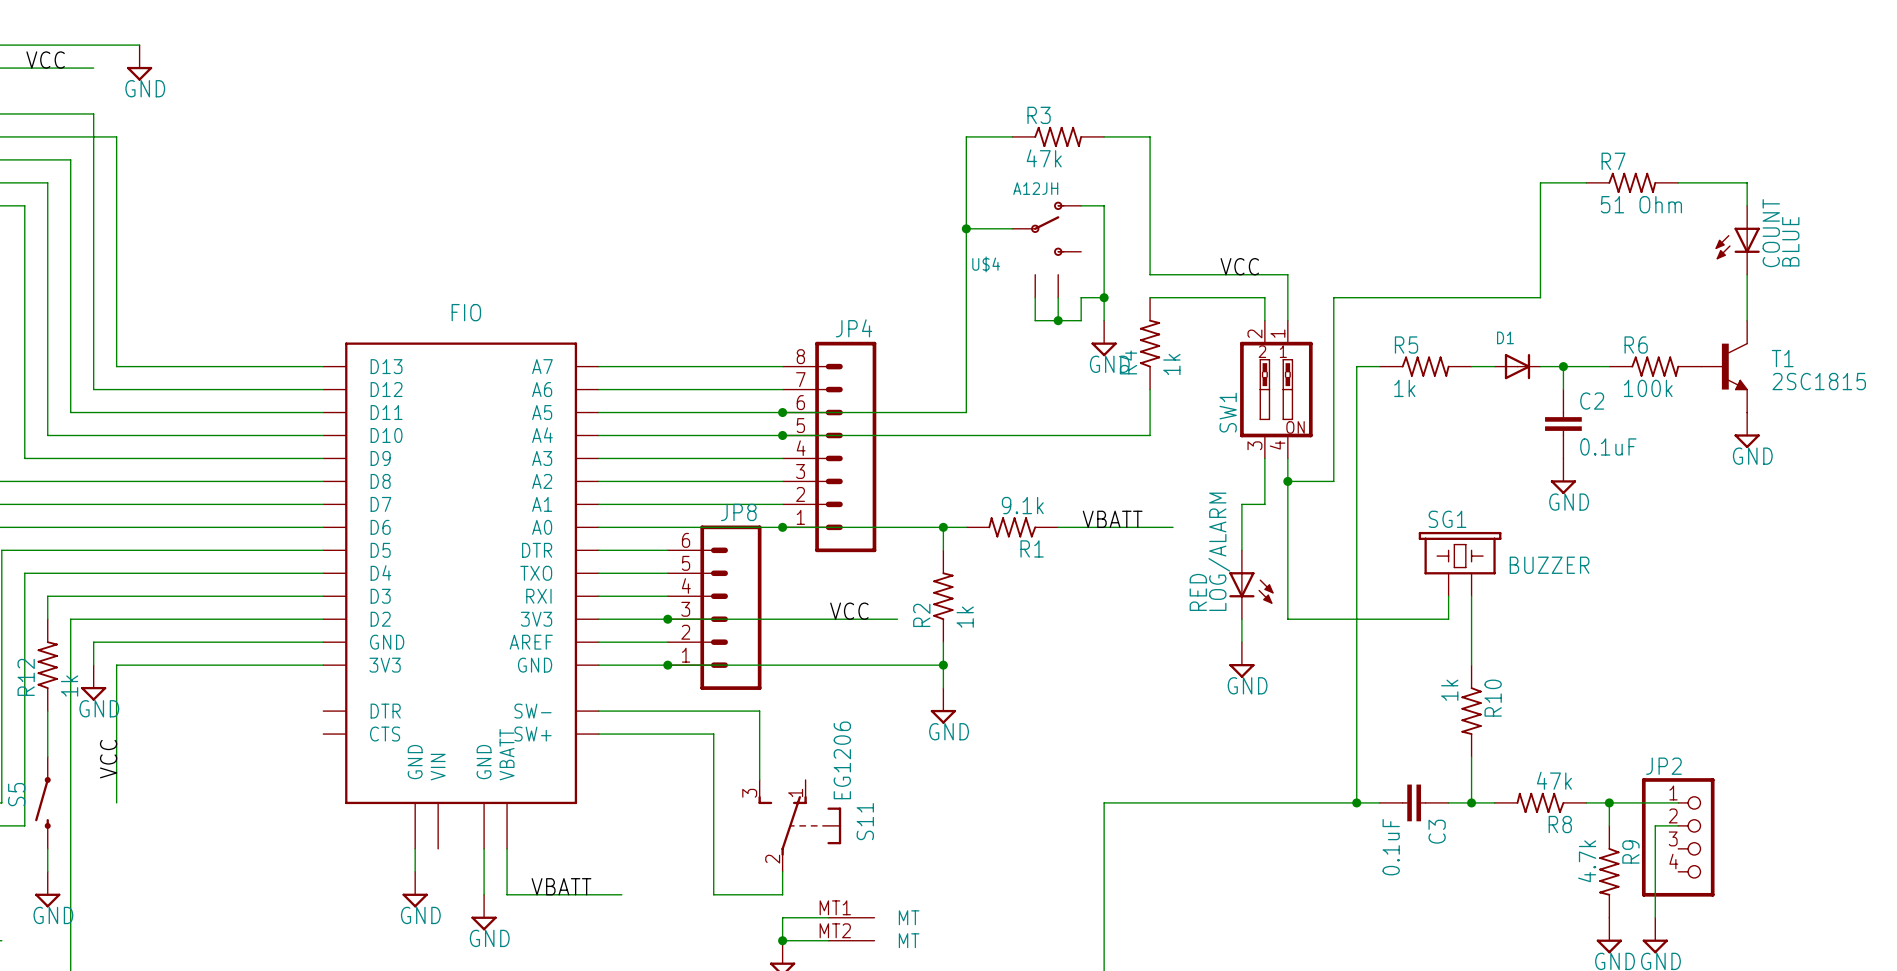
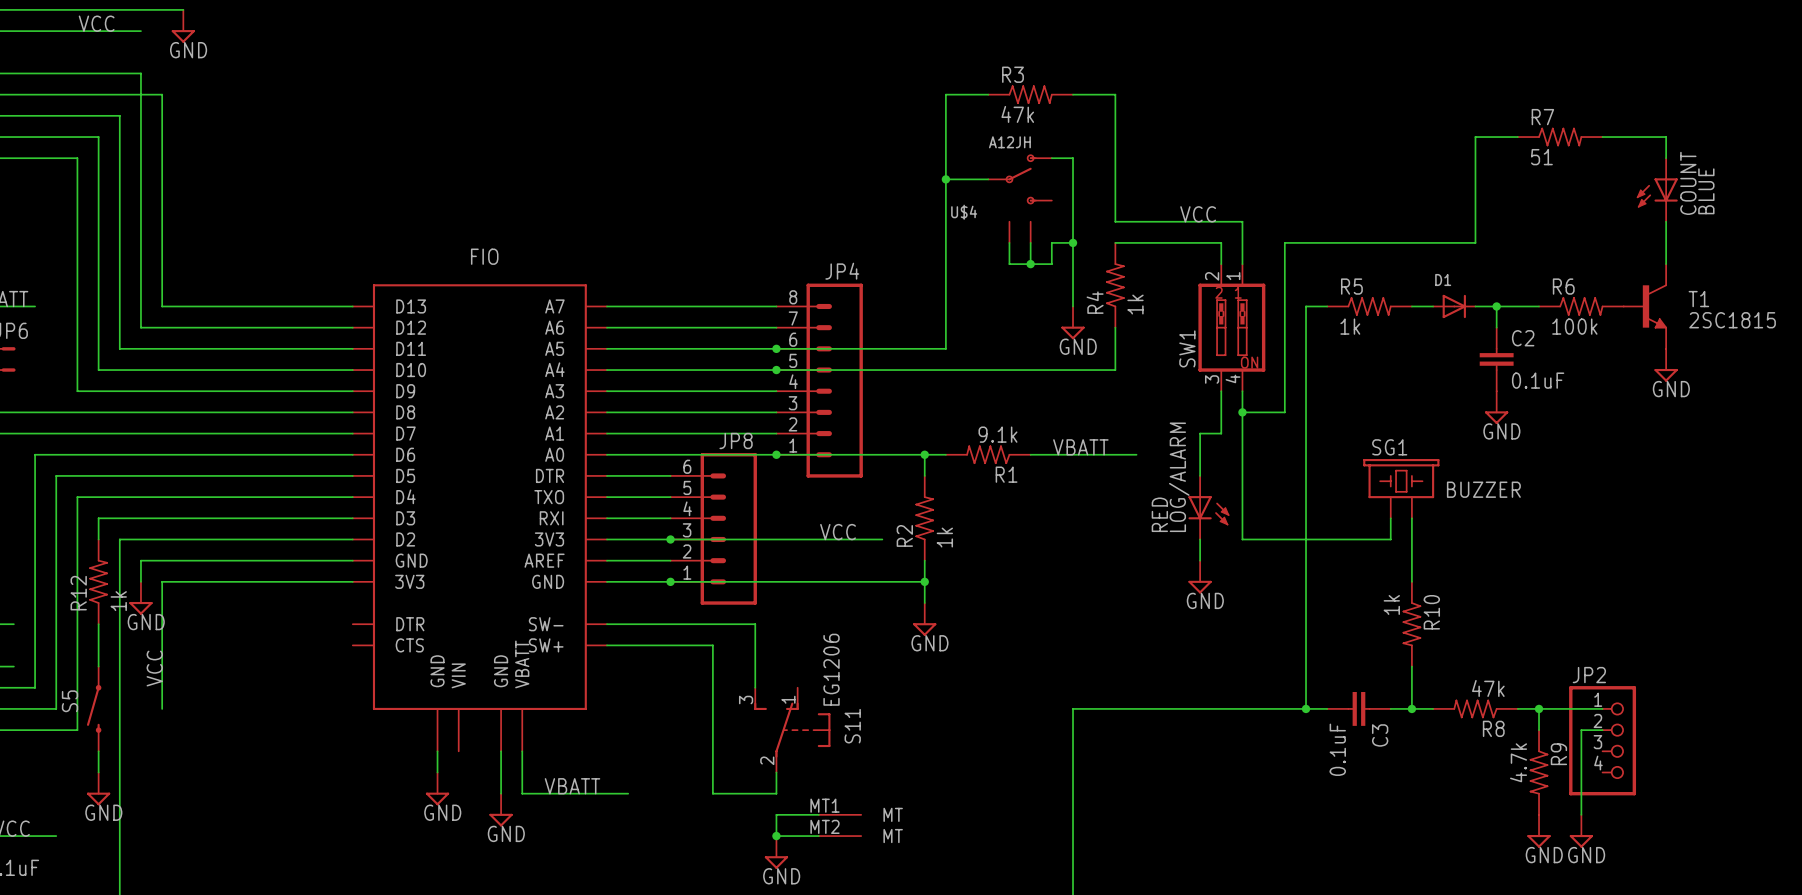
R7 value: 51 Ohm (1641, 204) -> 51 (1541, 157)
power symbol position: GND (1104, 338) -> GND (1073, 322)

